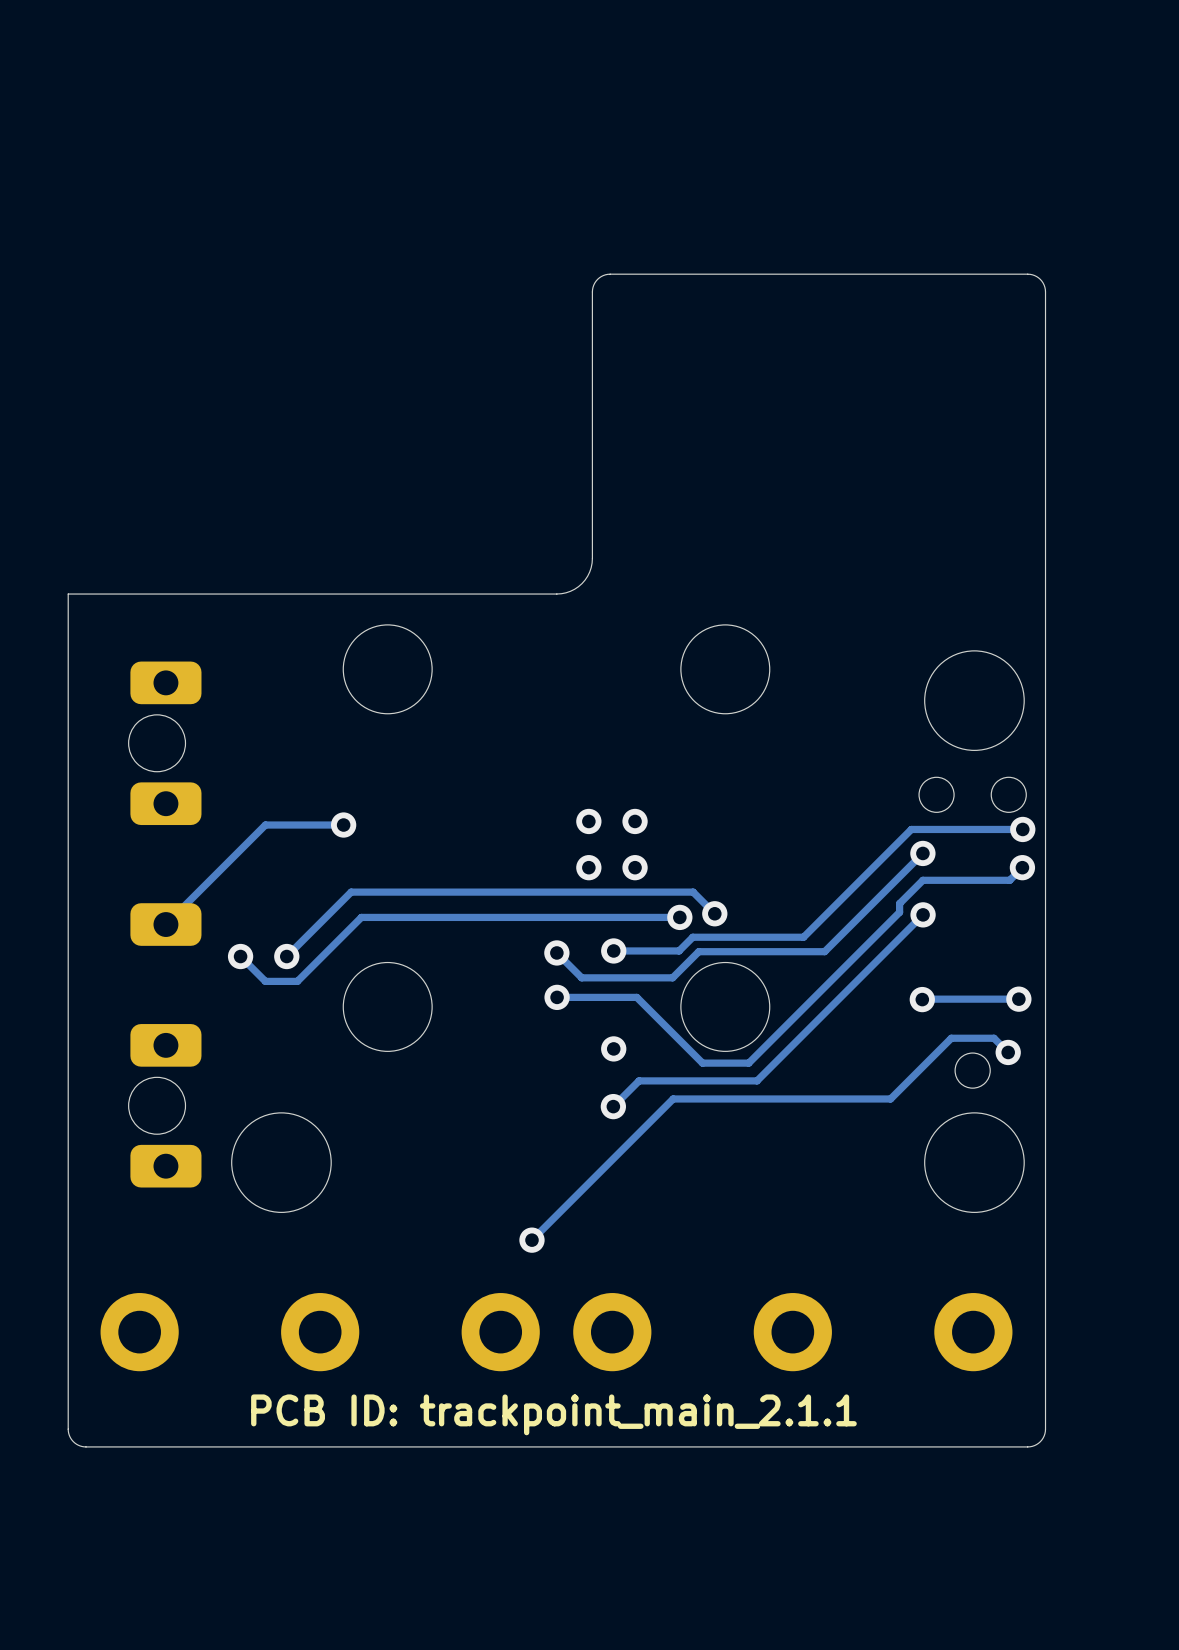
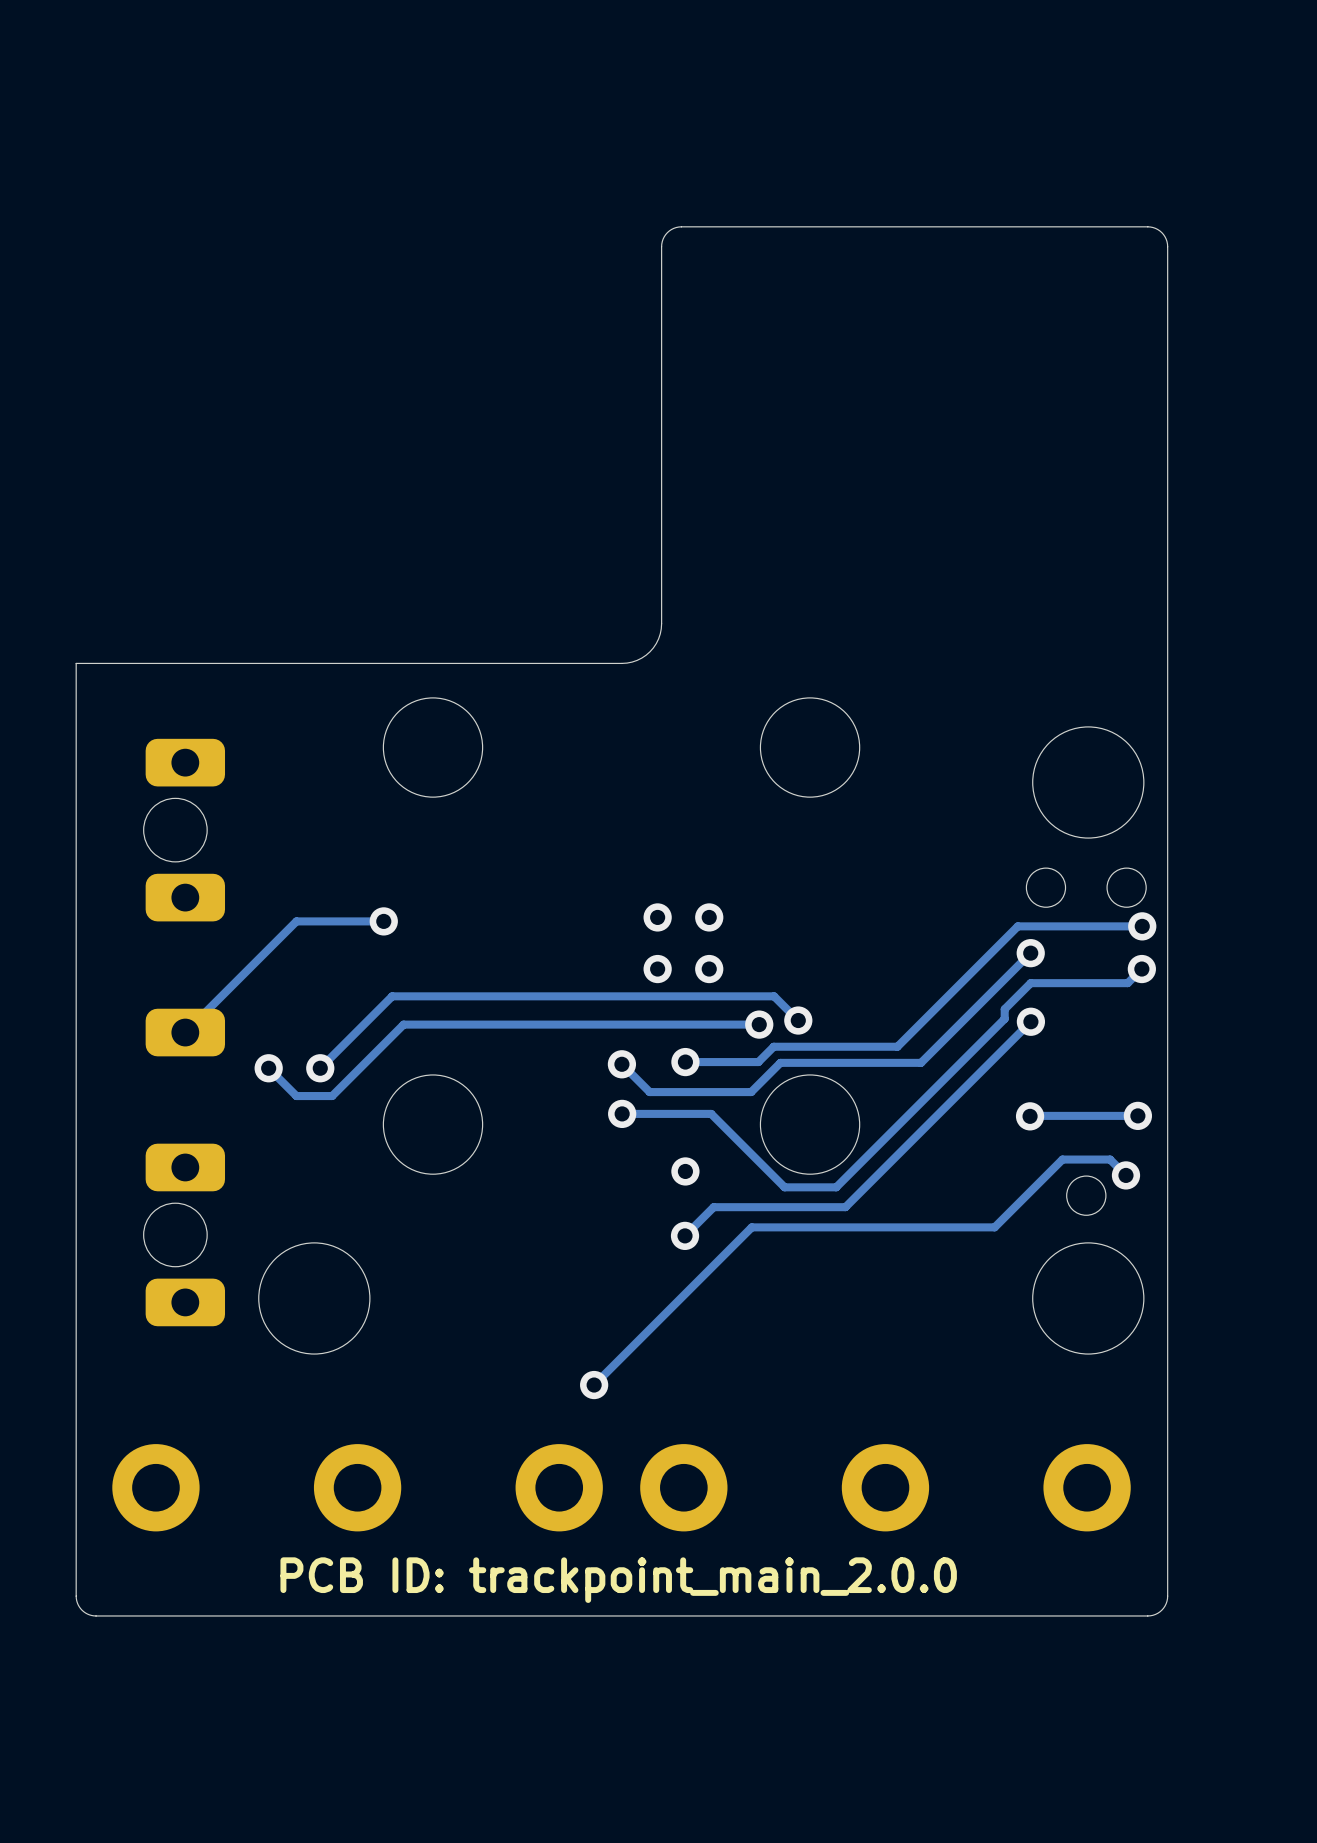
board edge: (1045, 291) (1040, 279) (1027, 274) (610, 274) (597, 279) (592, 291) -> (1167, 326) (1166, 241) (1159, 230) (1147, 226) (676, 227) (667, 232) (661, 244) (661, 326)
text: PCB ID: trackpoint_main_2.1.1 (553, 1414) -> PCB ID: trackpoint_main_2.0.0 (618, 1580)

